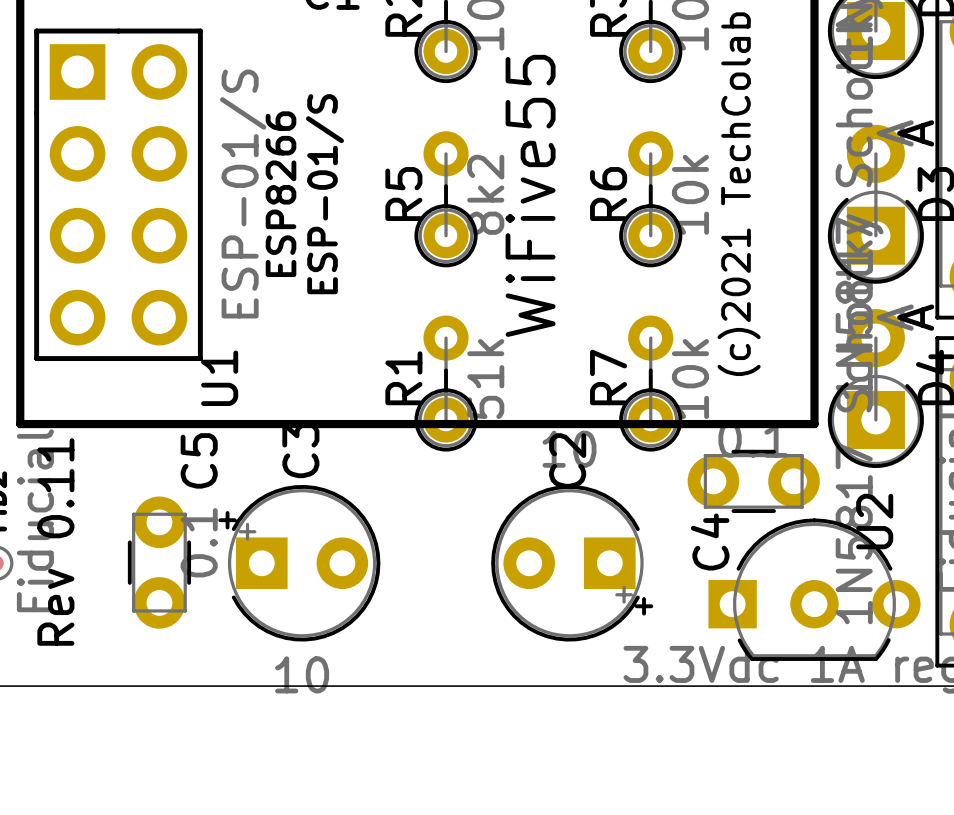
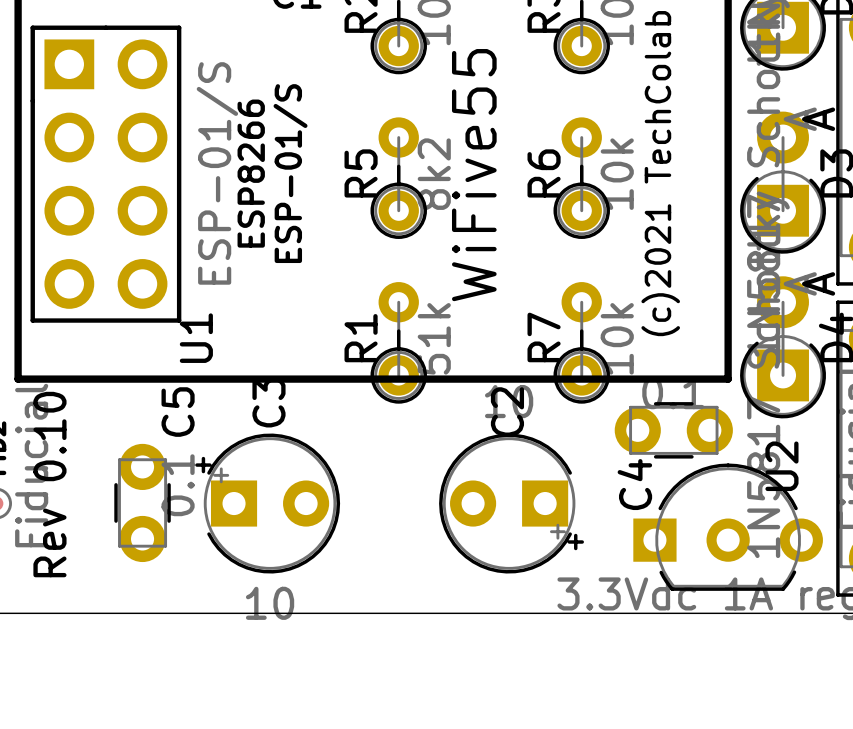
text: Rev 0.11 (55, 542) -> Rev 0.10 (49, 484)

